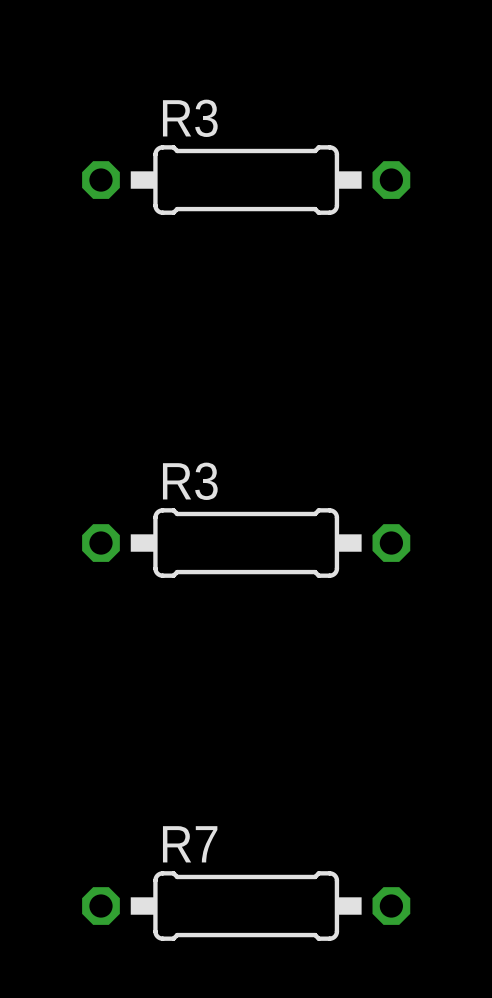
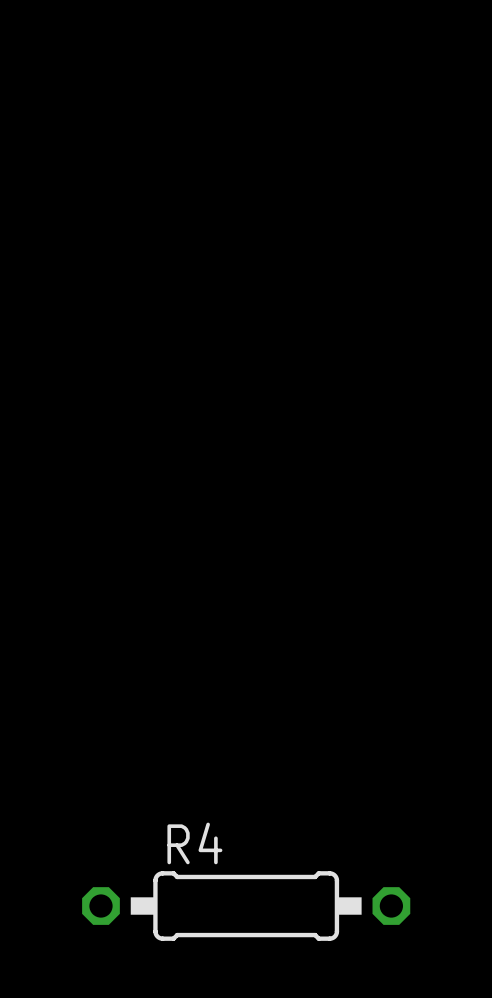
R3: (246, 180) -> none
R3: (246, 543) -> none
R7 name: R7 (190, 844) -> R4 (194, 843)

